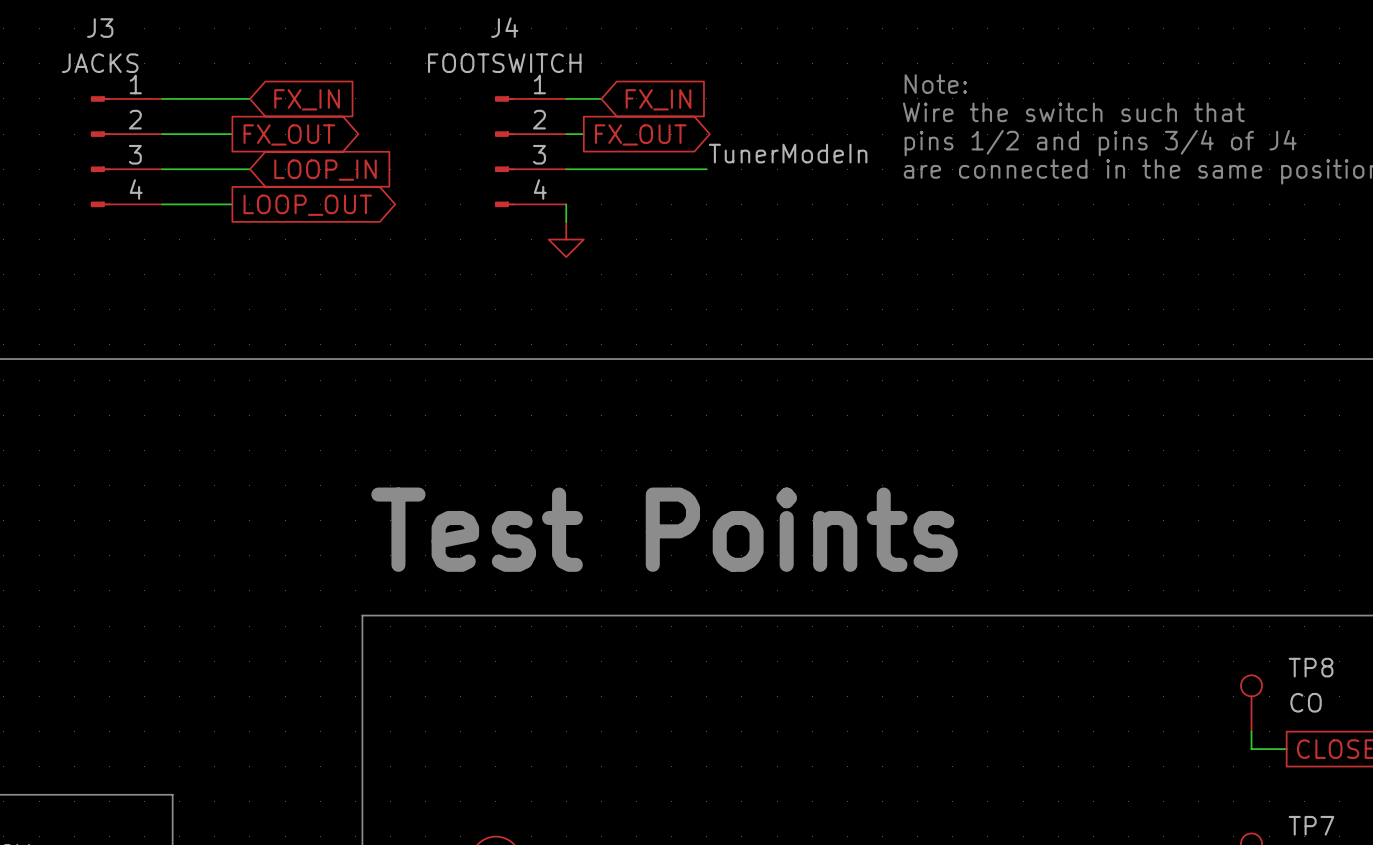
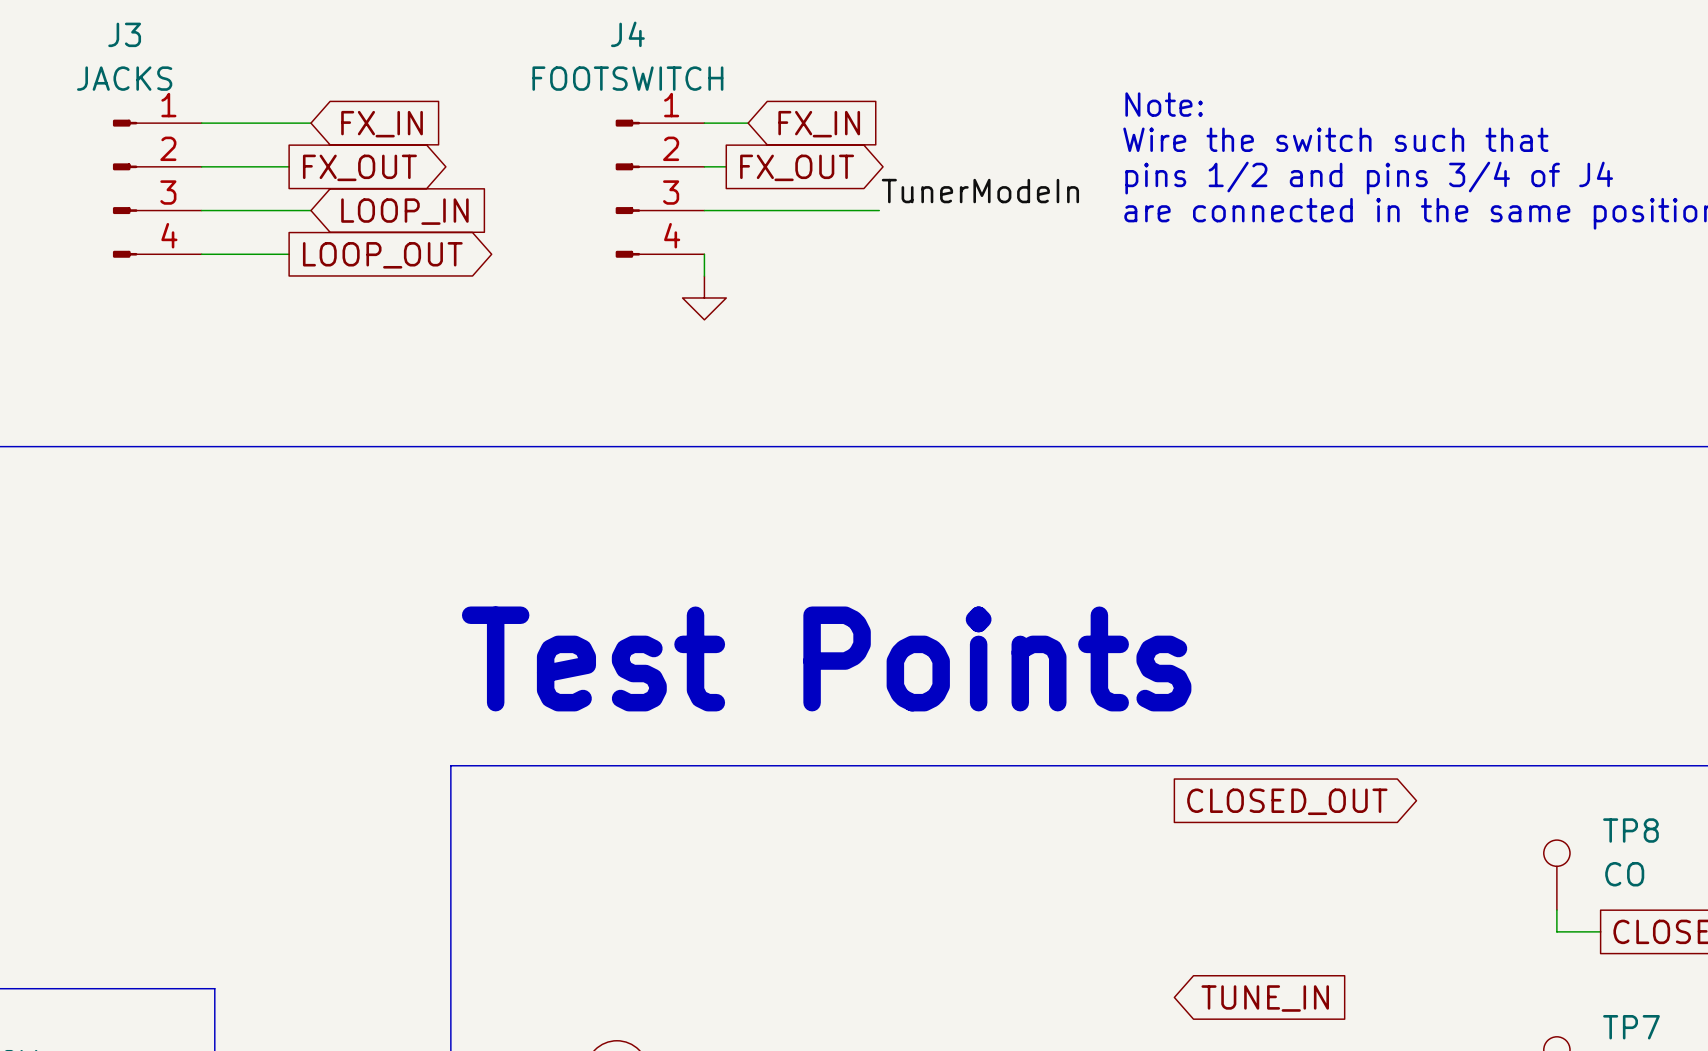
global label: none -> CLOSED_OUT (1287, 801)
global label: none -> TUNE_IN (1265, 998)

